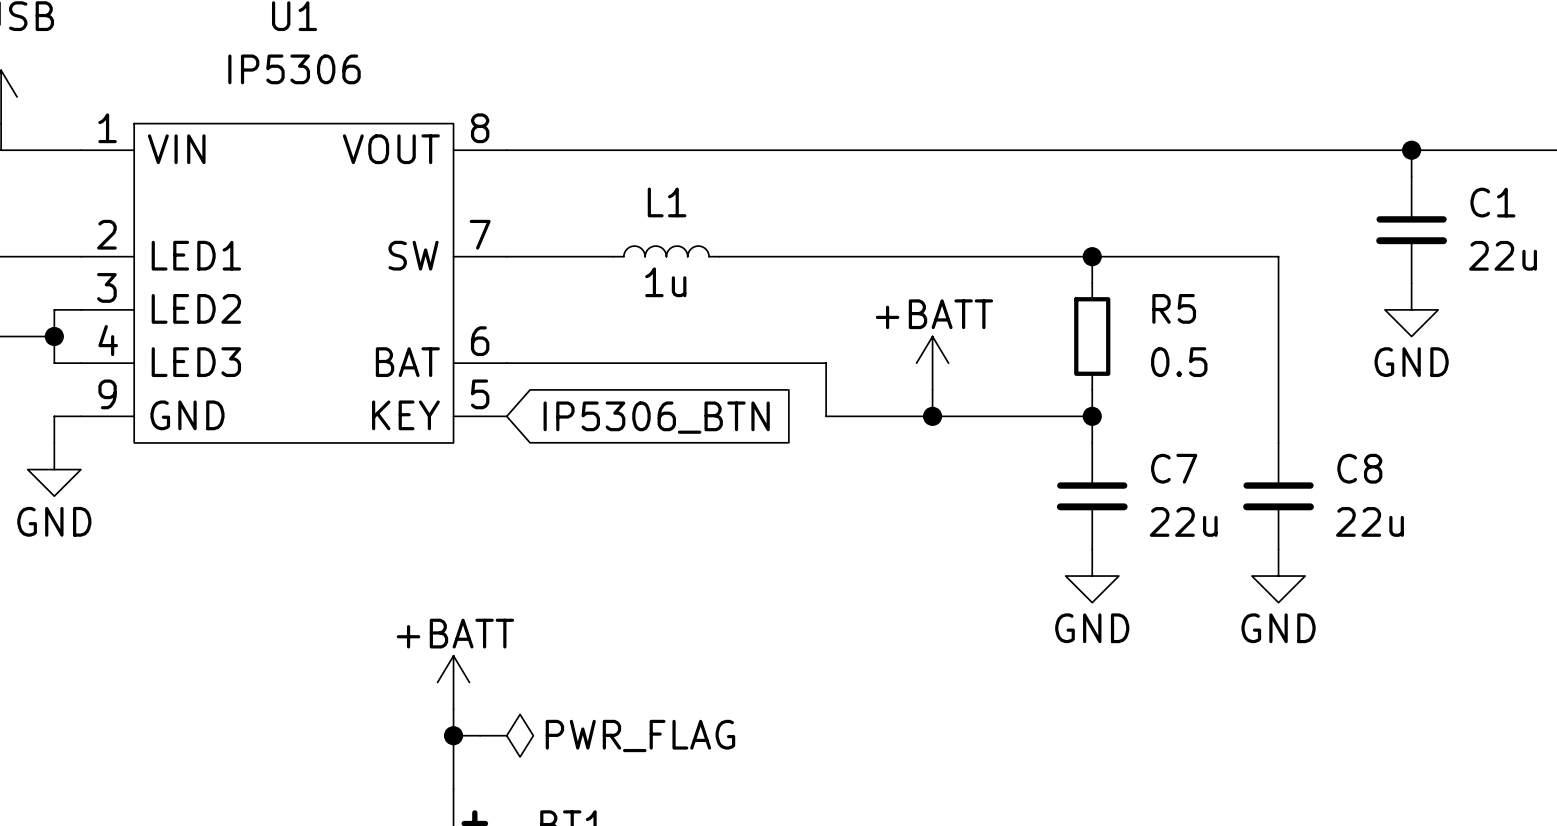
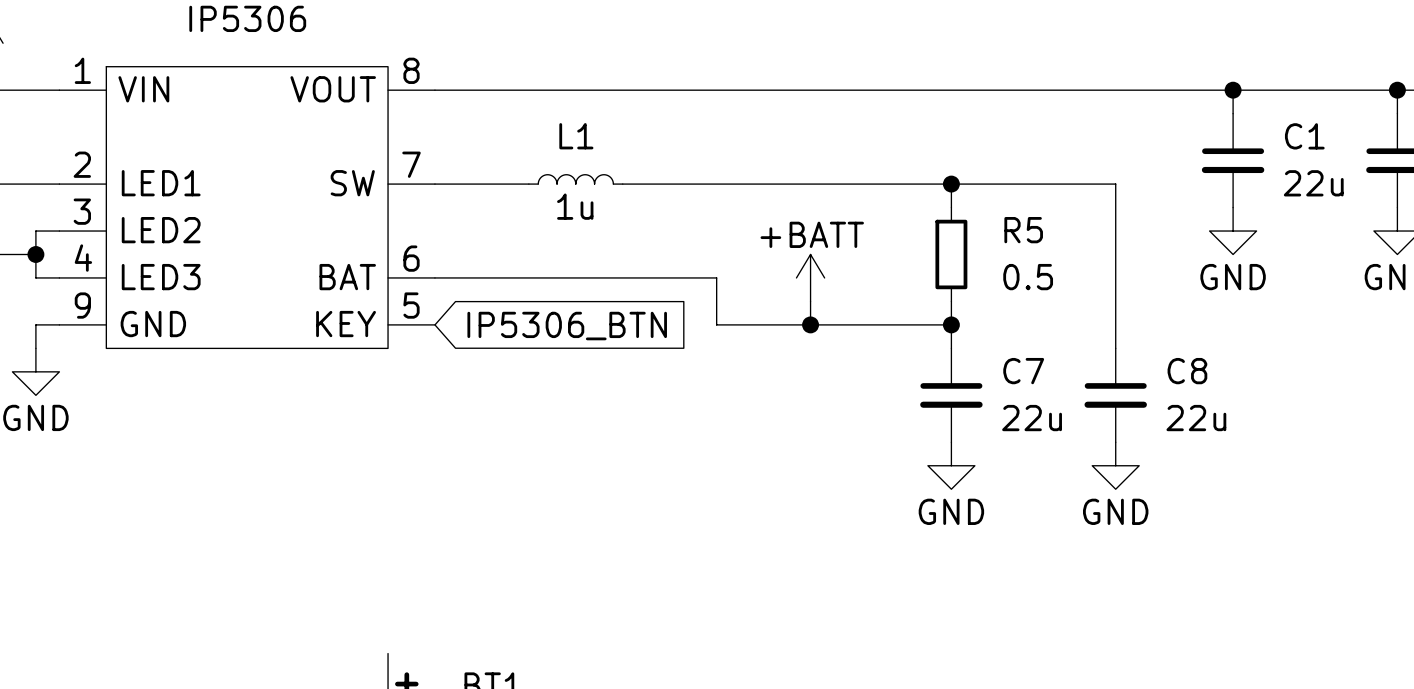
power symbol: +BATT (453, 682) -> none
wire: (453, 709) (453, 788) -> none
wire: (453, 735) (480, 735) -> none
junction: (453, 735) -> none
power symbol: PWR_FLAG (506, 735) -> none

